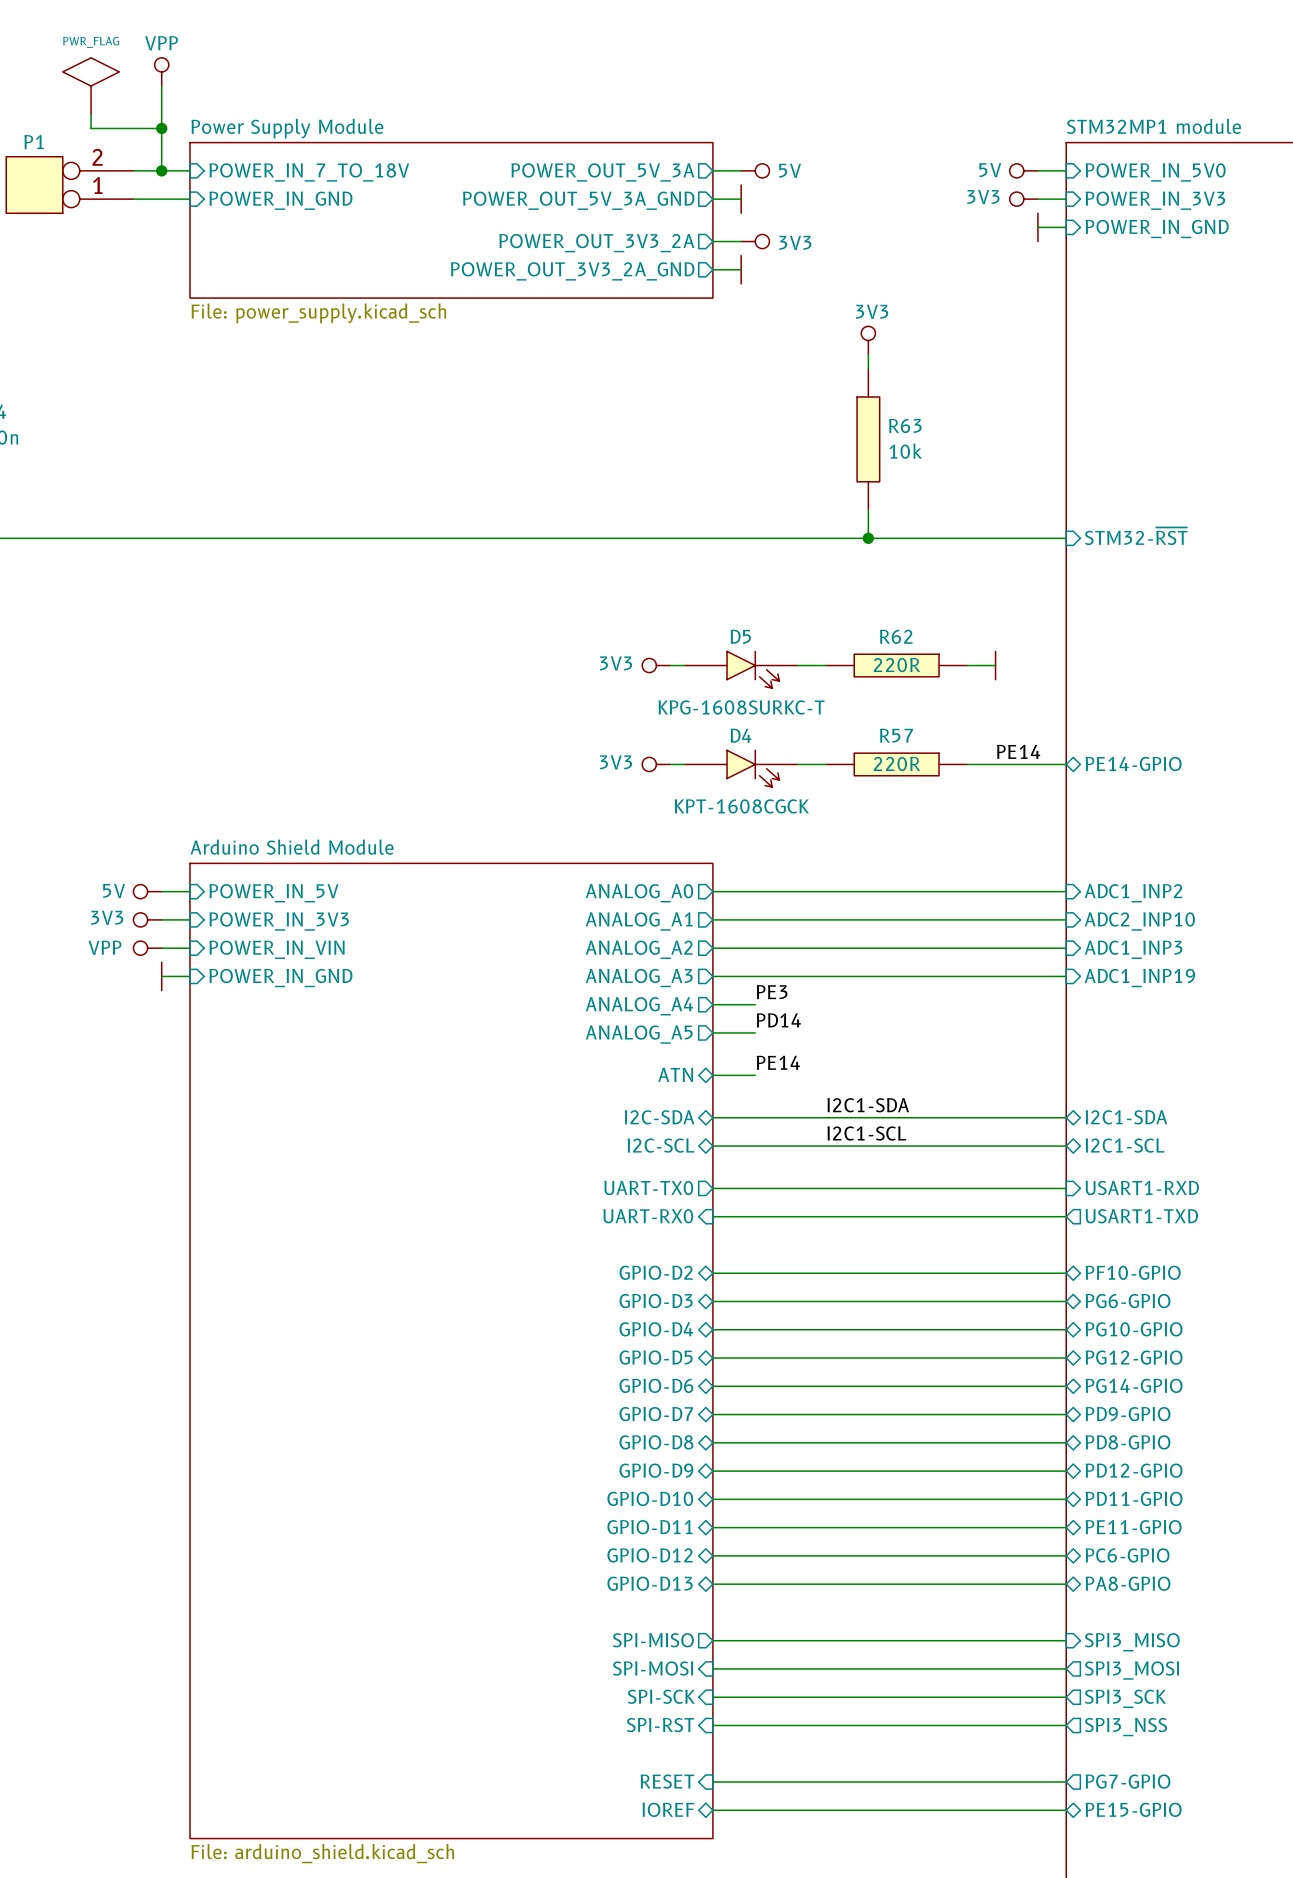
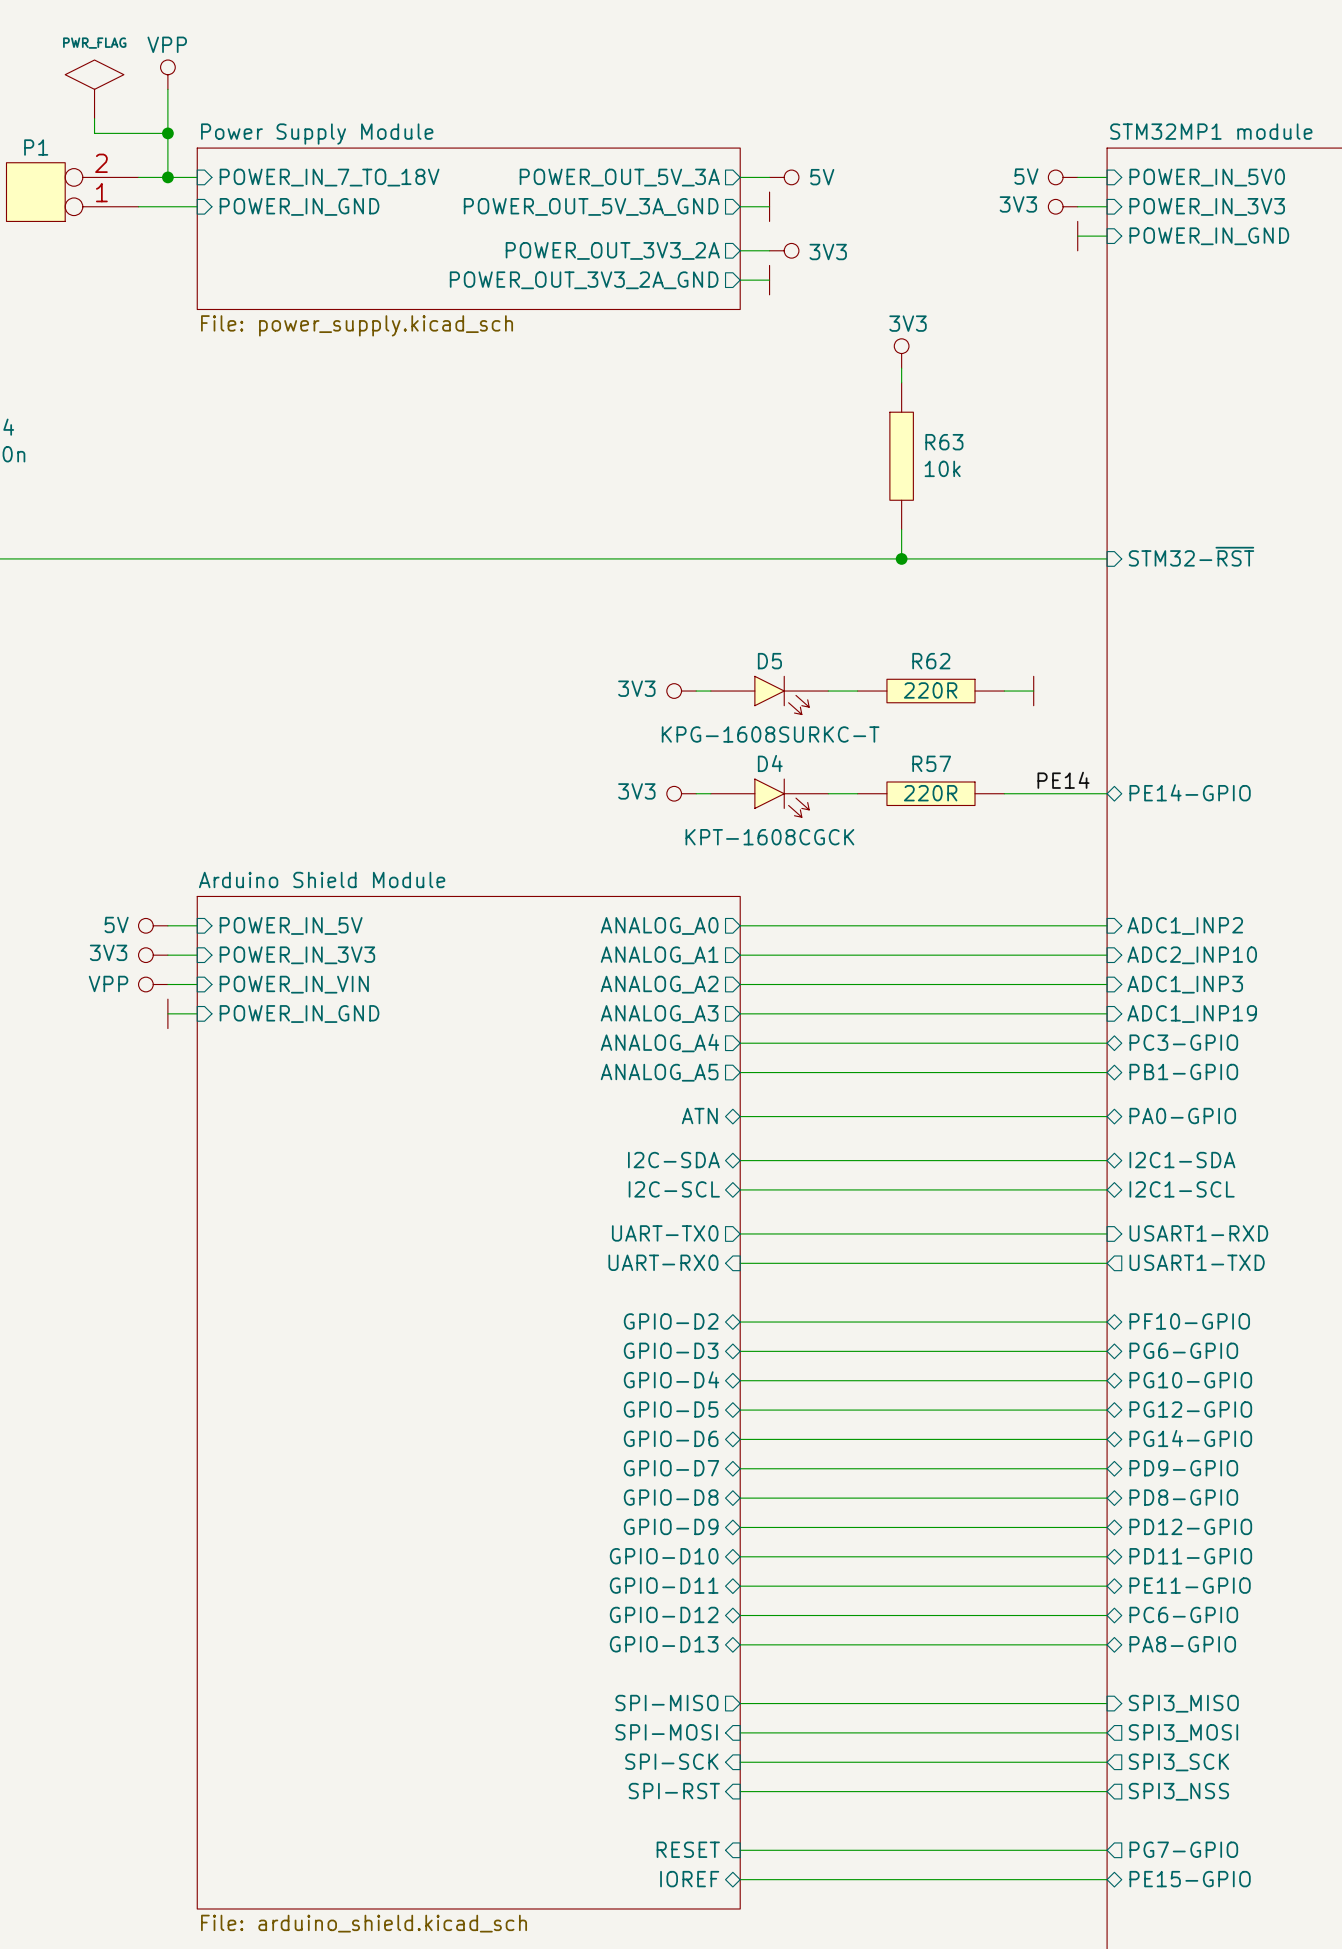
label: PE3 (772, 992) -> none
wire: none -> (784, 1043) (1107, 1043)
sheet pin: none -> PC3-GPIO (1183, 1042)
label: PD14 (778, 1020) -> none
wire: none -> (784, 1072) (1107, 1072)
sheet pin: none -> PB1-GPIO (1183, 1072)
label: PE14 (778, 1062) -> none
sheet pin: none -> PA0-GPIO (1182, 1116)
wire: none -> (784, 1116) (1107, 1116)
label: I2C1-SDA (868, 1105) -> none
label: I2C1-SCL (866, 1133) -> none

